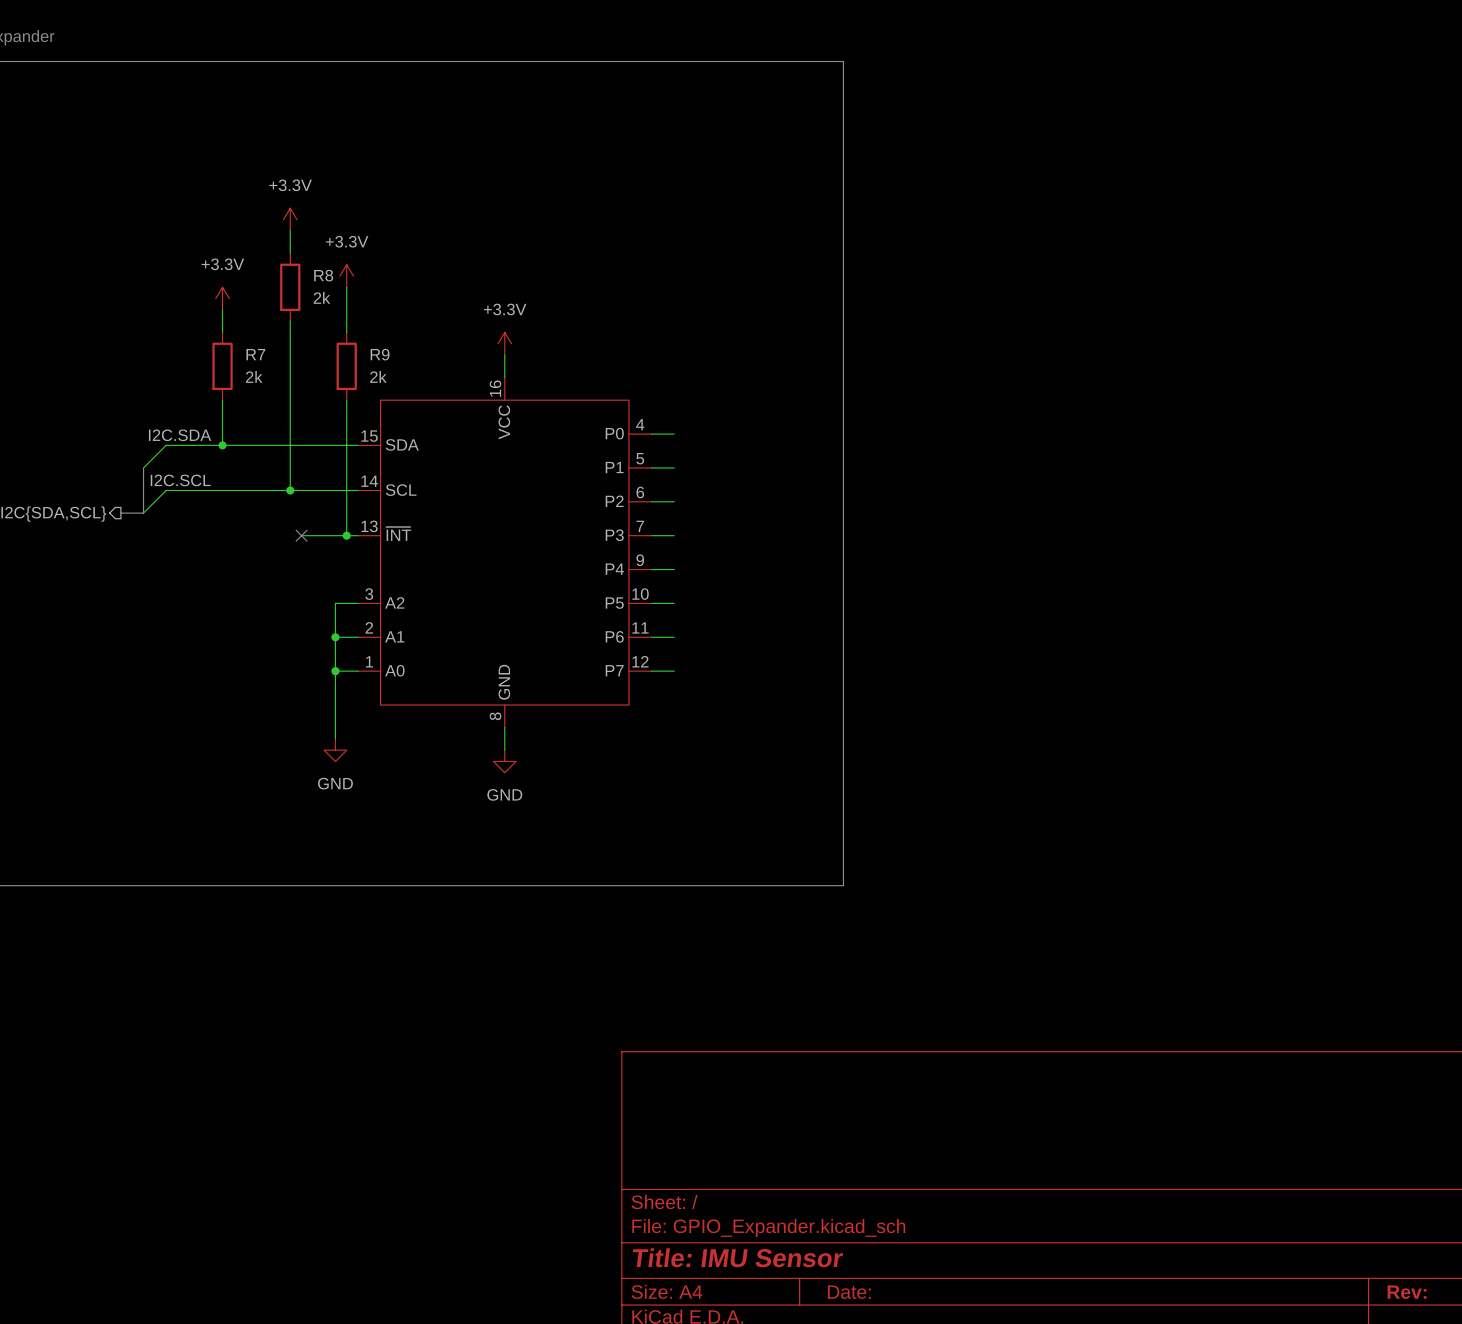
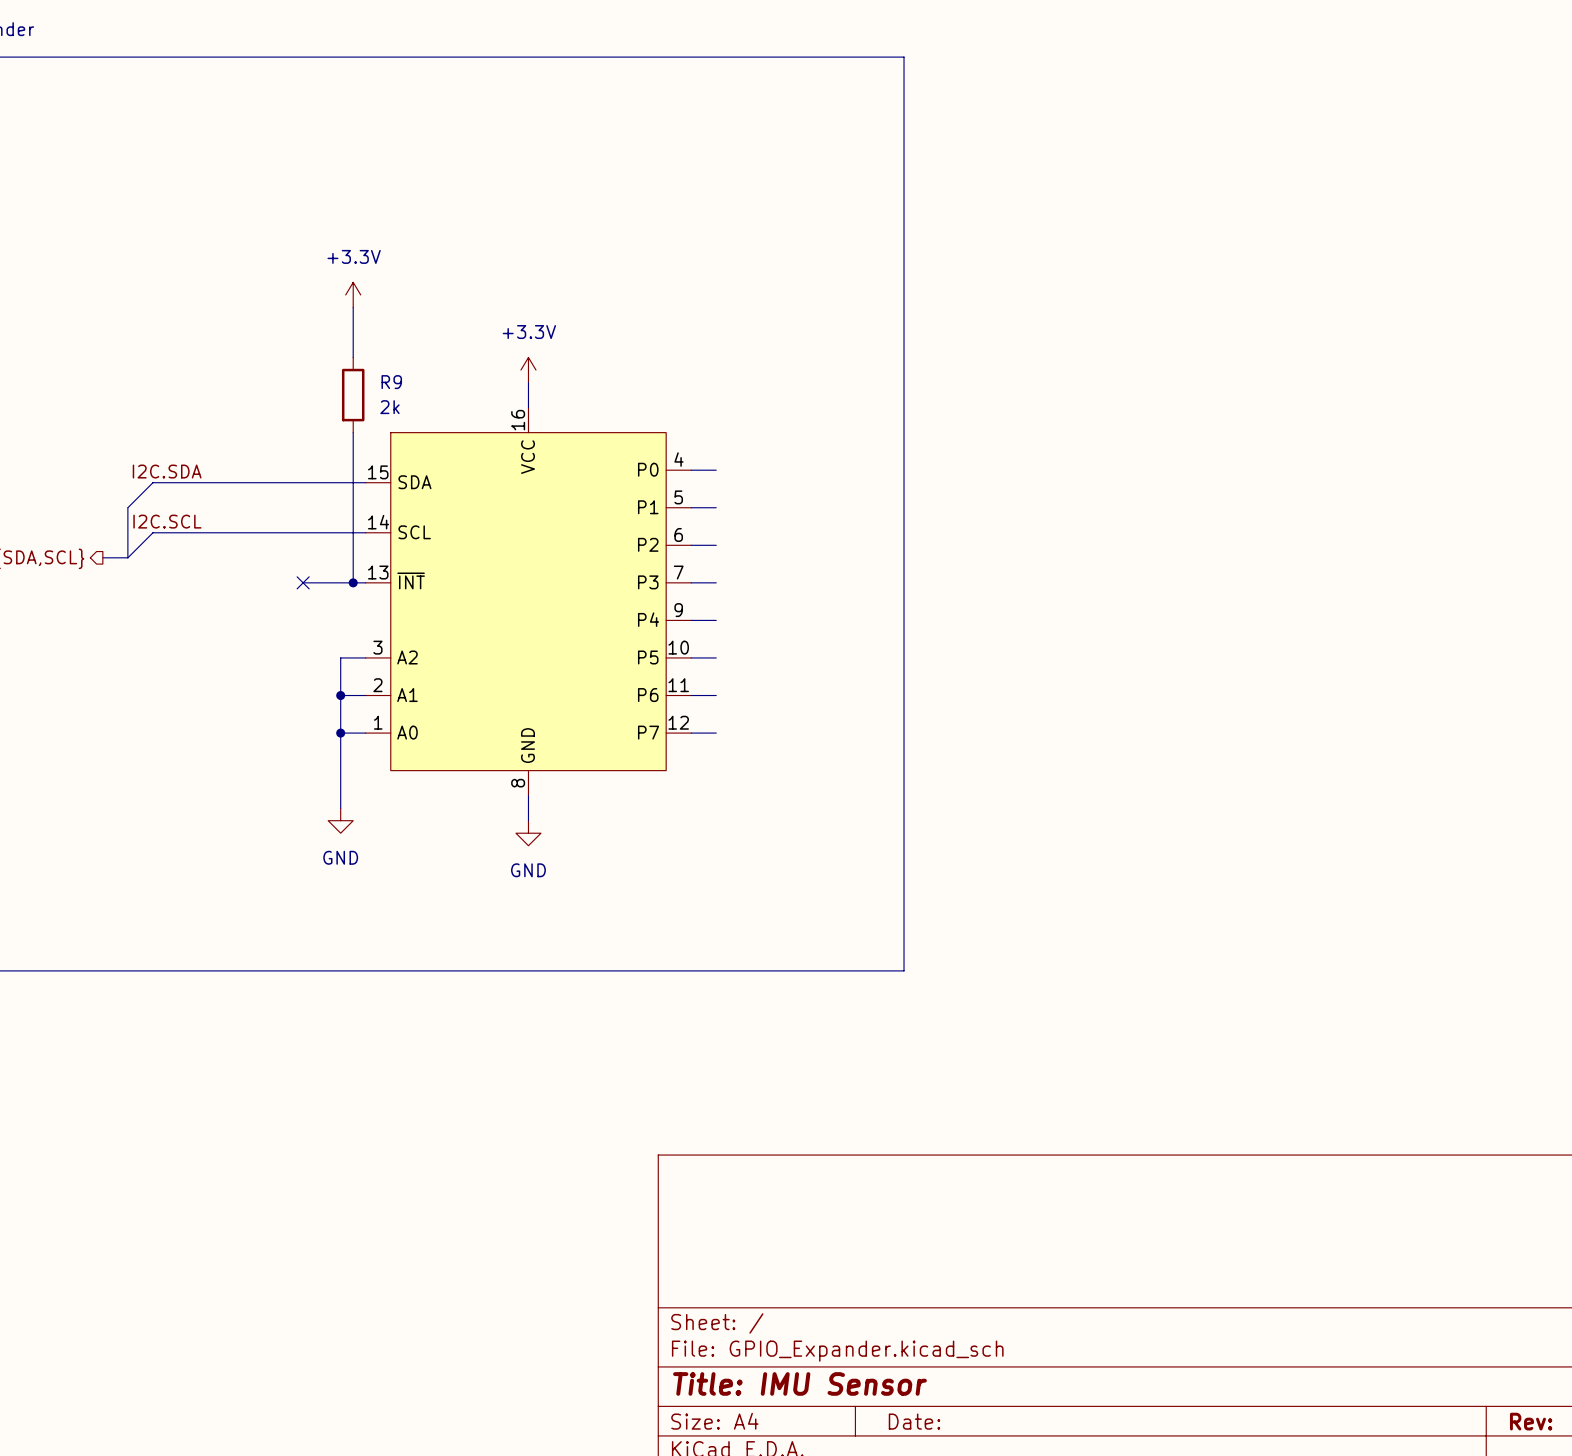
power symbol: +3.3V (290, 219) -> none
wire: (290, 230) (290, 253) -> none
R8: 2k (290, 287) -> none
power symbol: +3.3V (222, 298) -> none
wire: (222, 309) (222, 332) -> none
wire: (290, 321) (290, 490) -> none
R7: 2k (222, 366) -> none
wire: (222, 400) (222, 445) -> none
junction: (222, 445) -> none
junction: (290, 490) -> none

